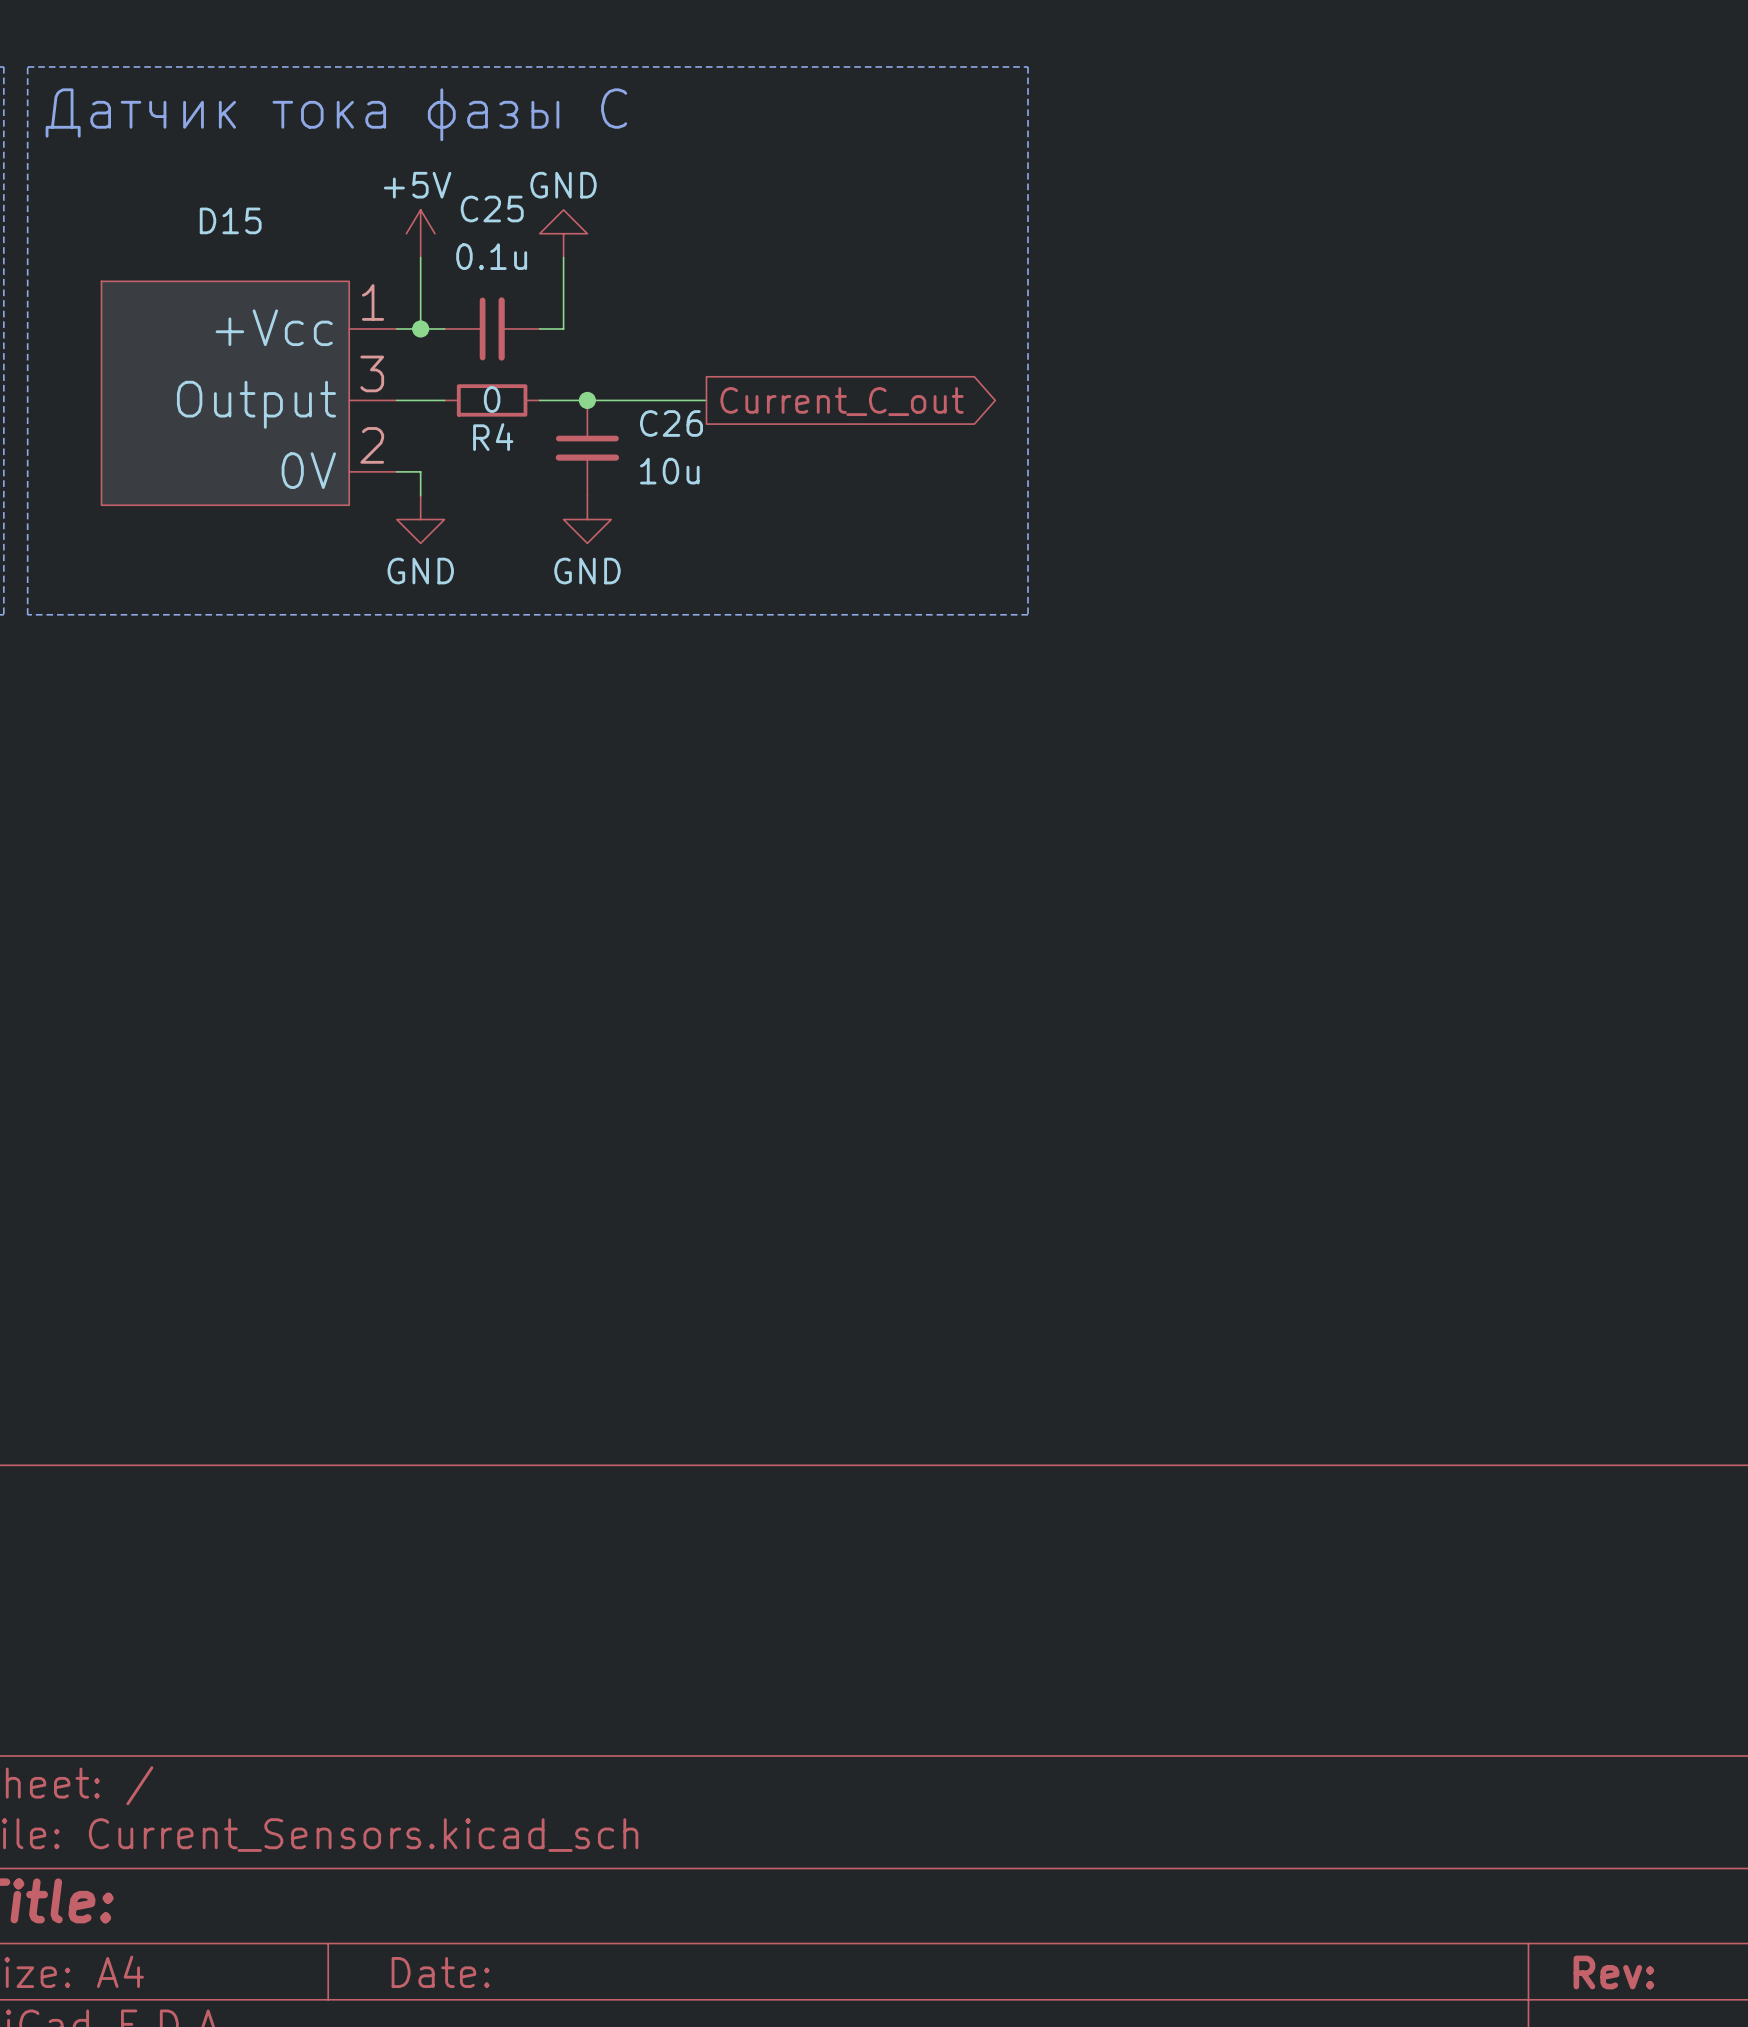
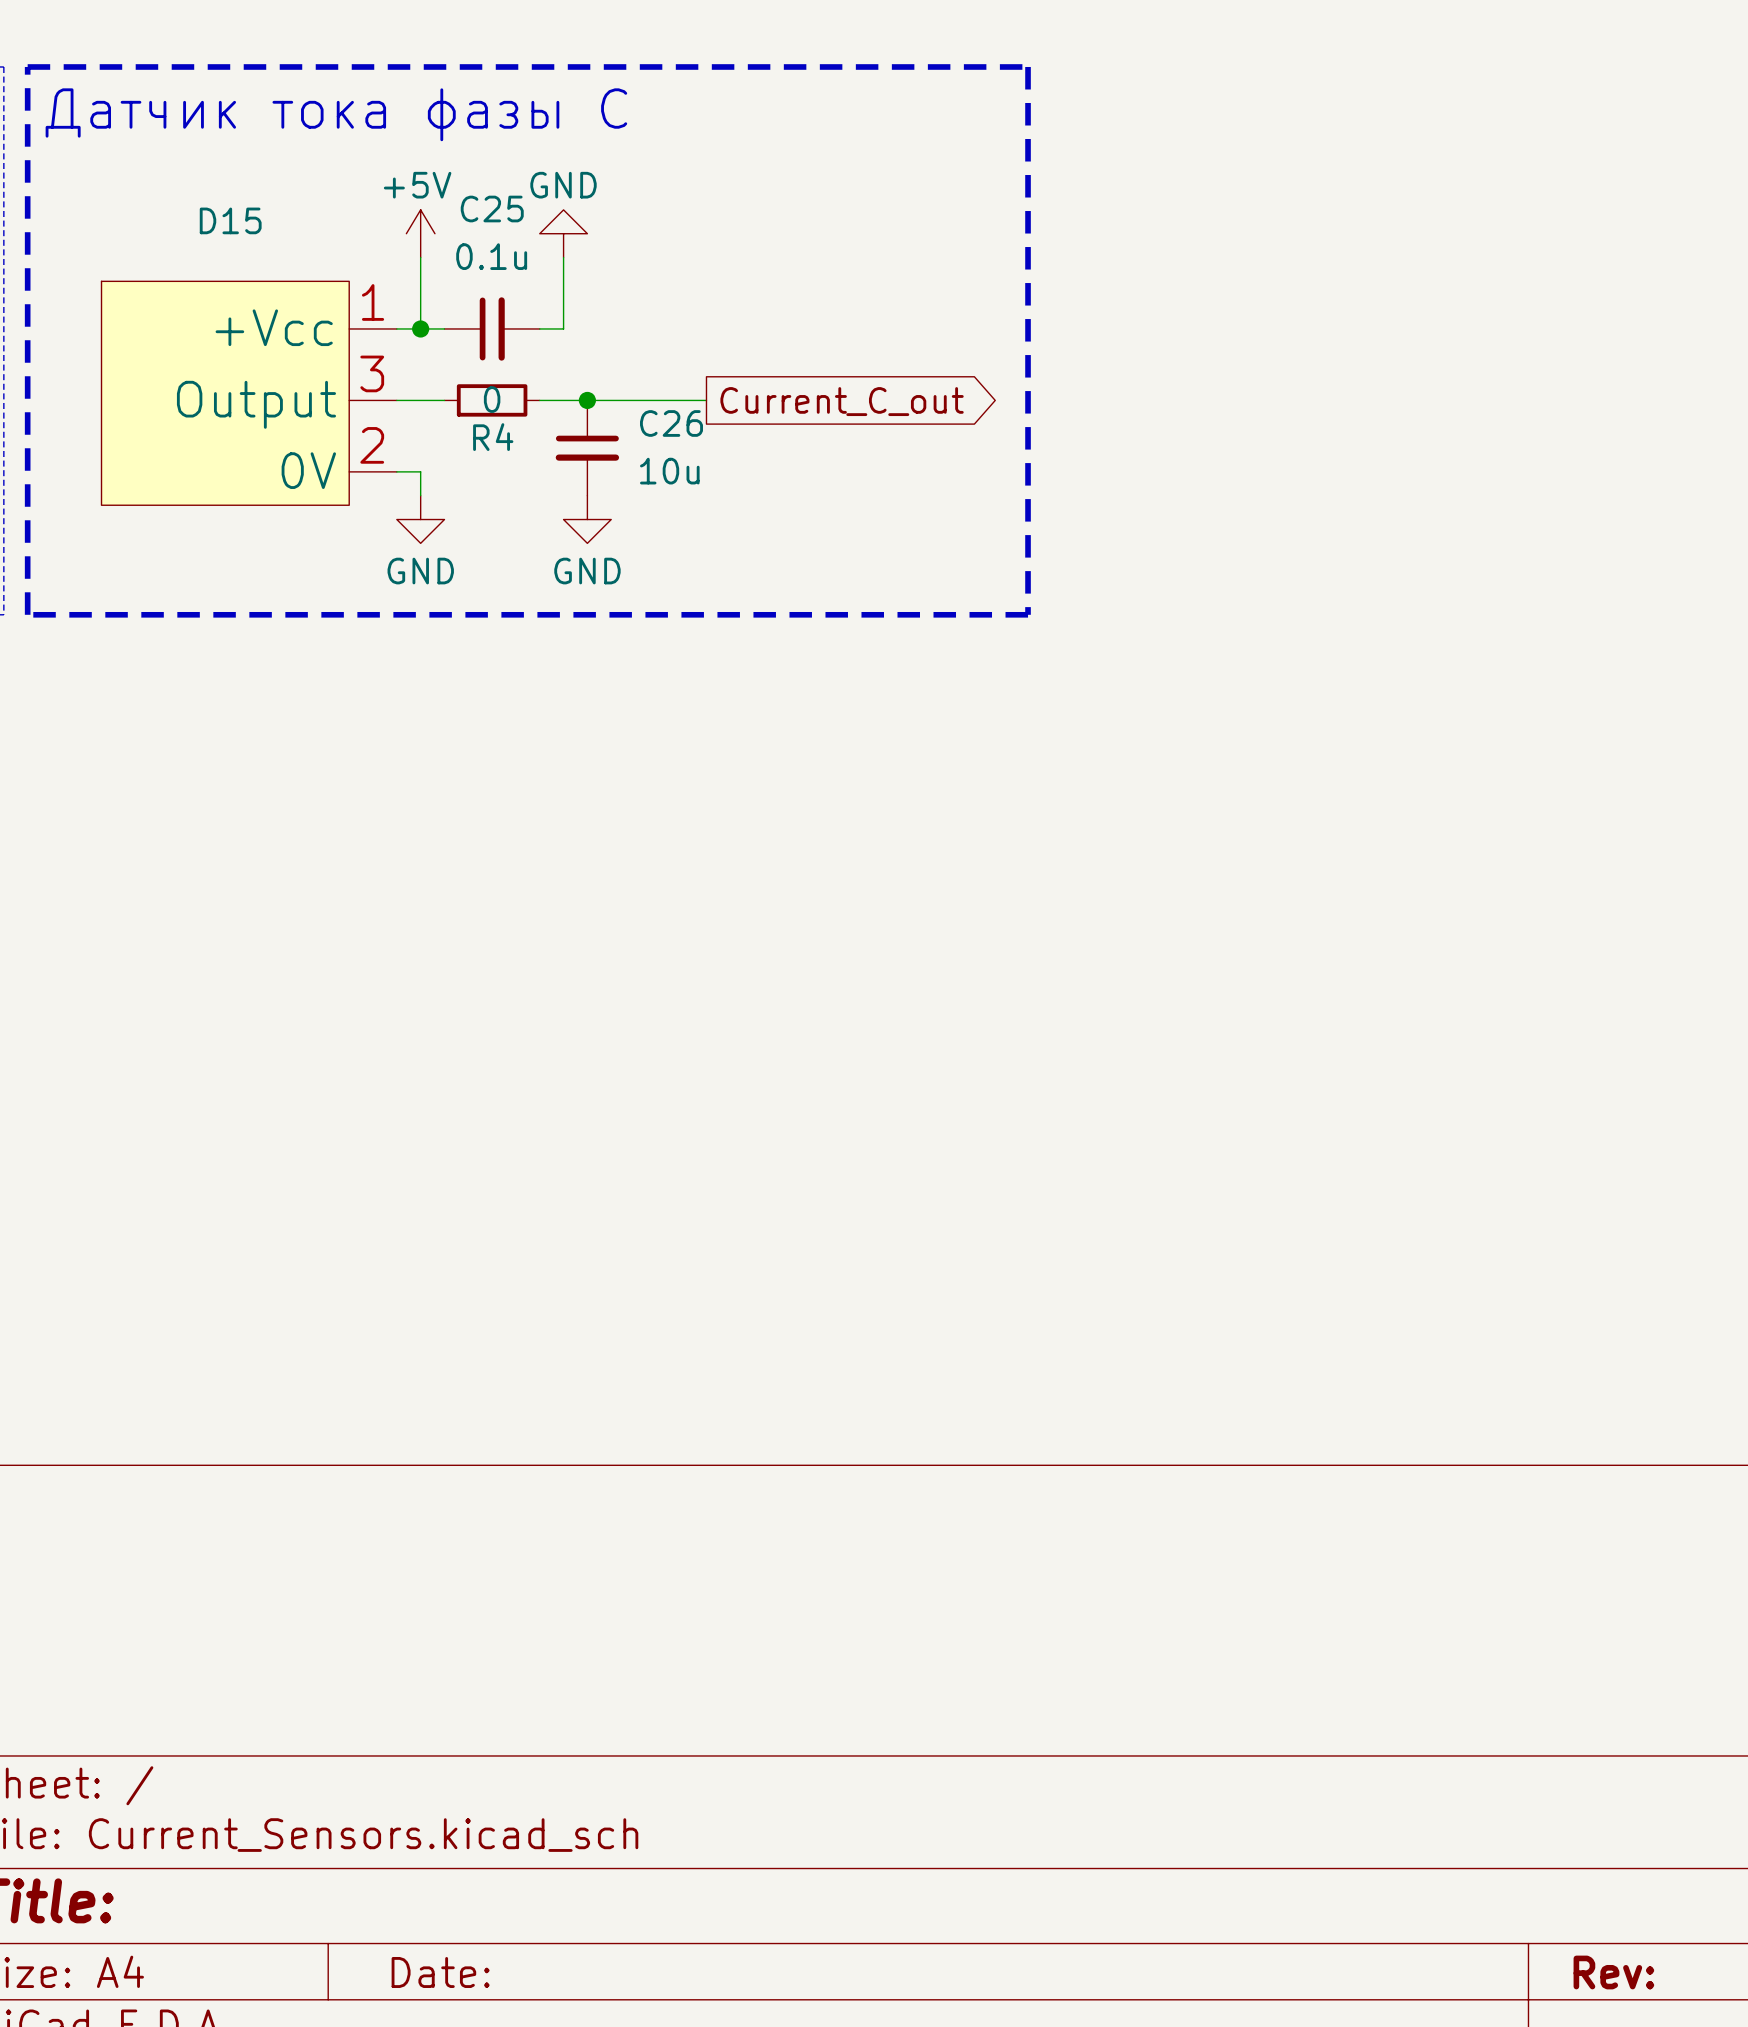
line width: thin (27, 66) (1028, 66) (1028, 614) (27, 614) (27, 66) -> thick (27, 66) (1028, 66) (1028, 614) (27, 614) (27, 66)

